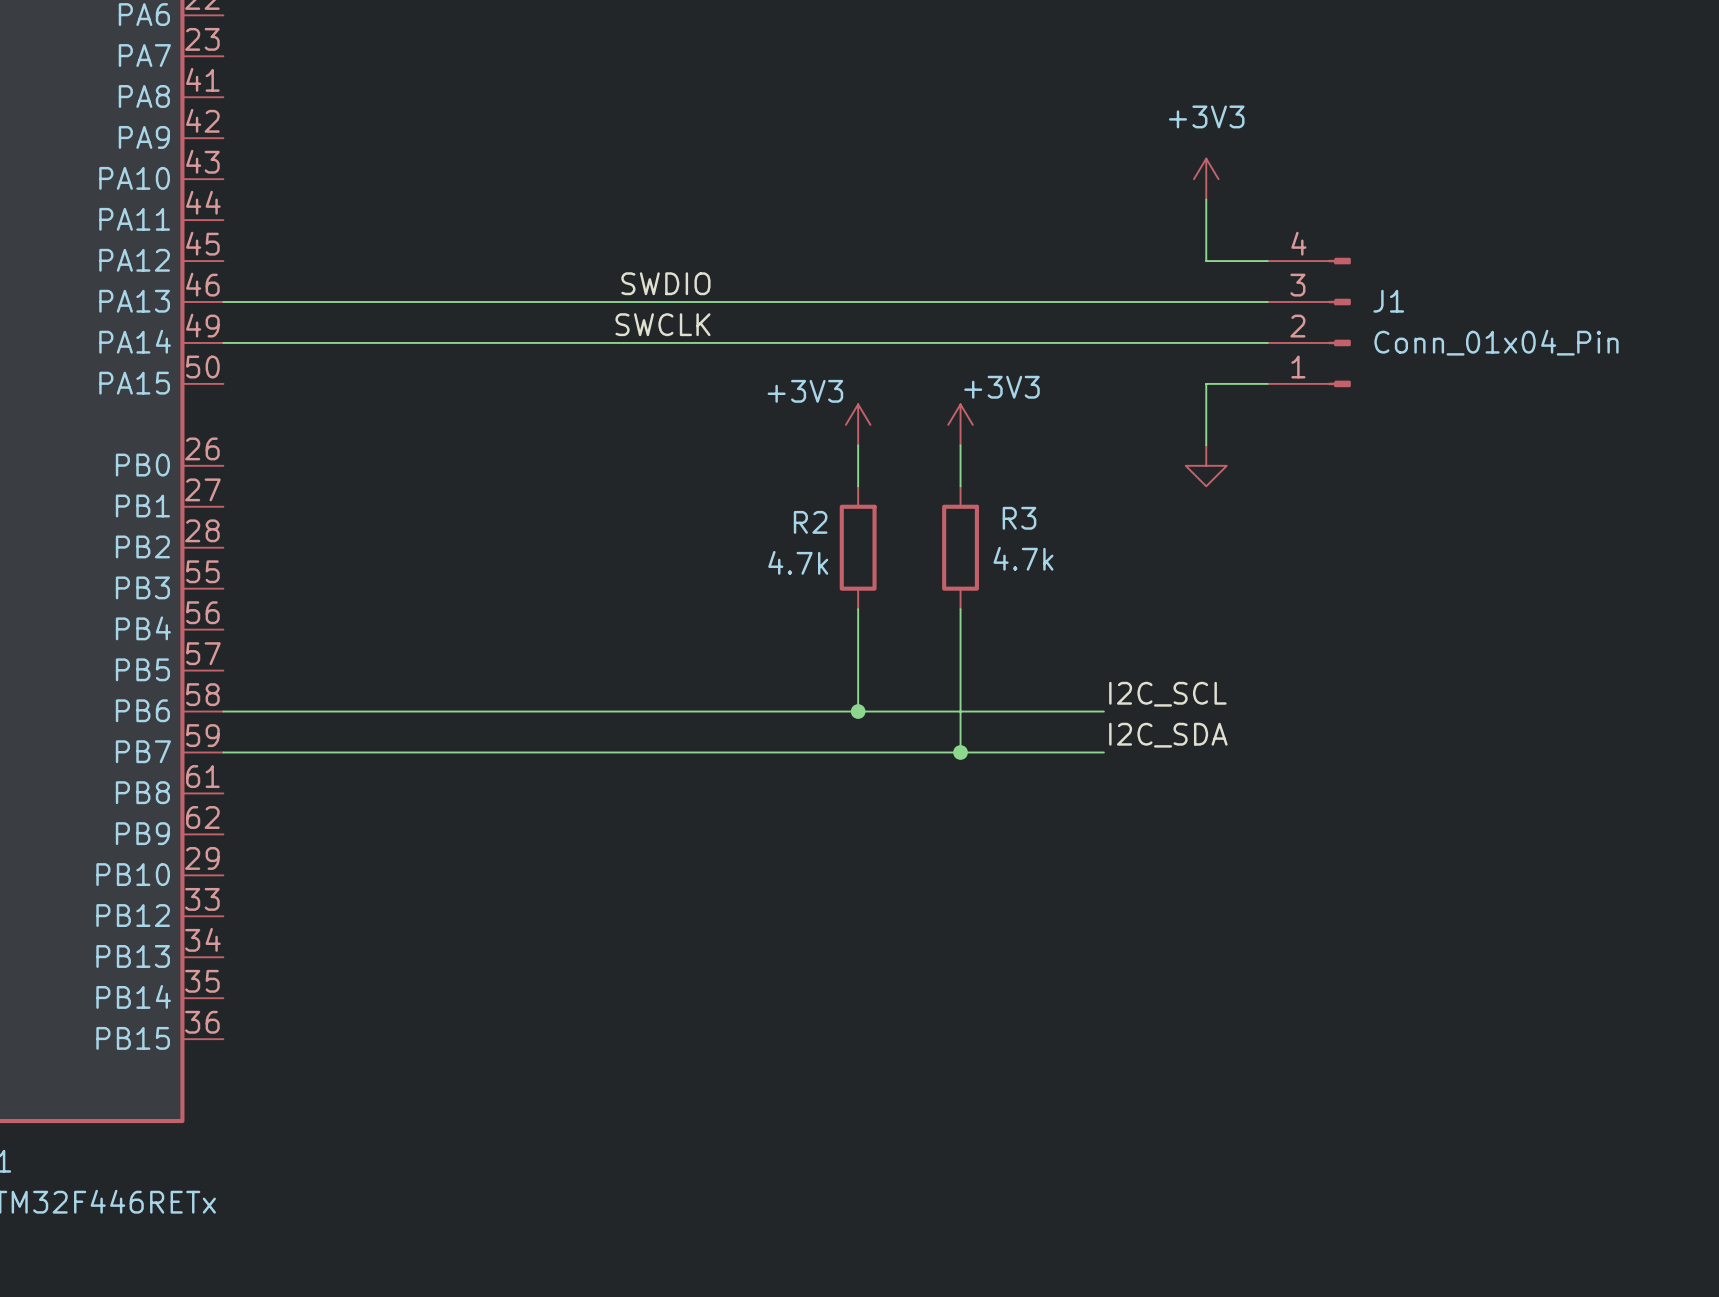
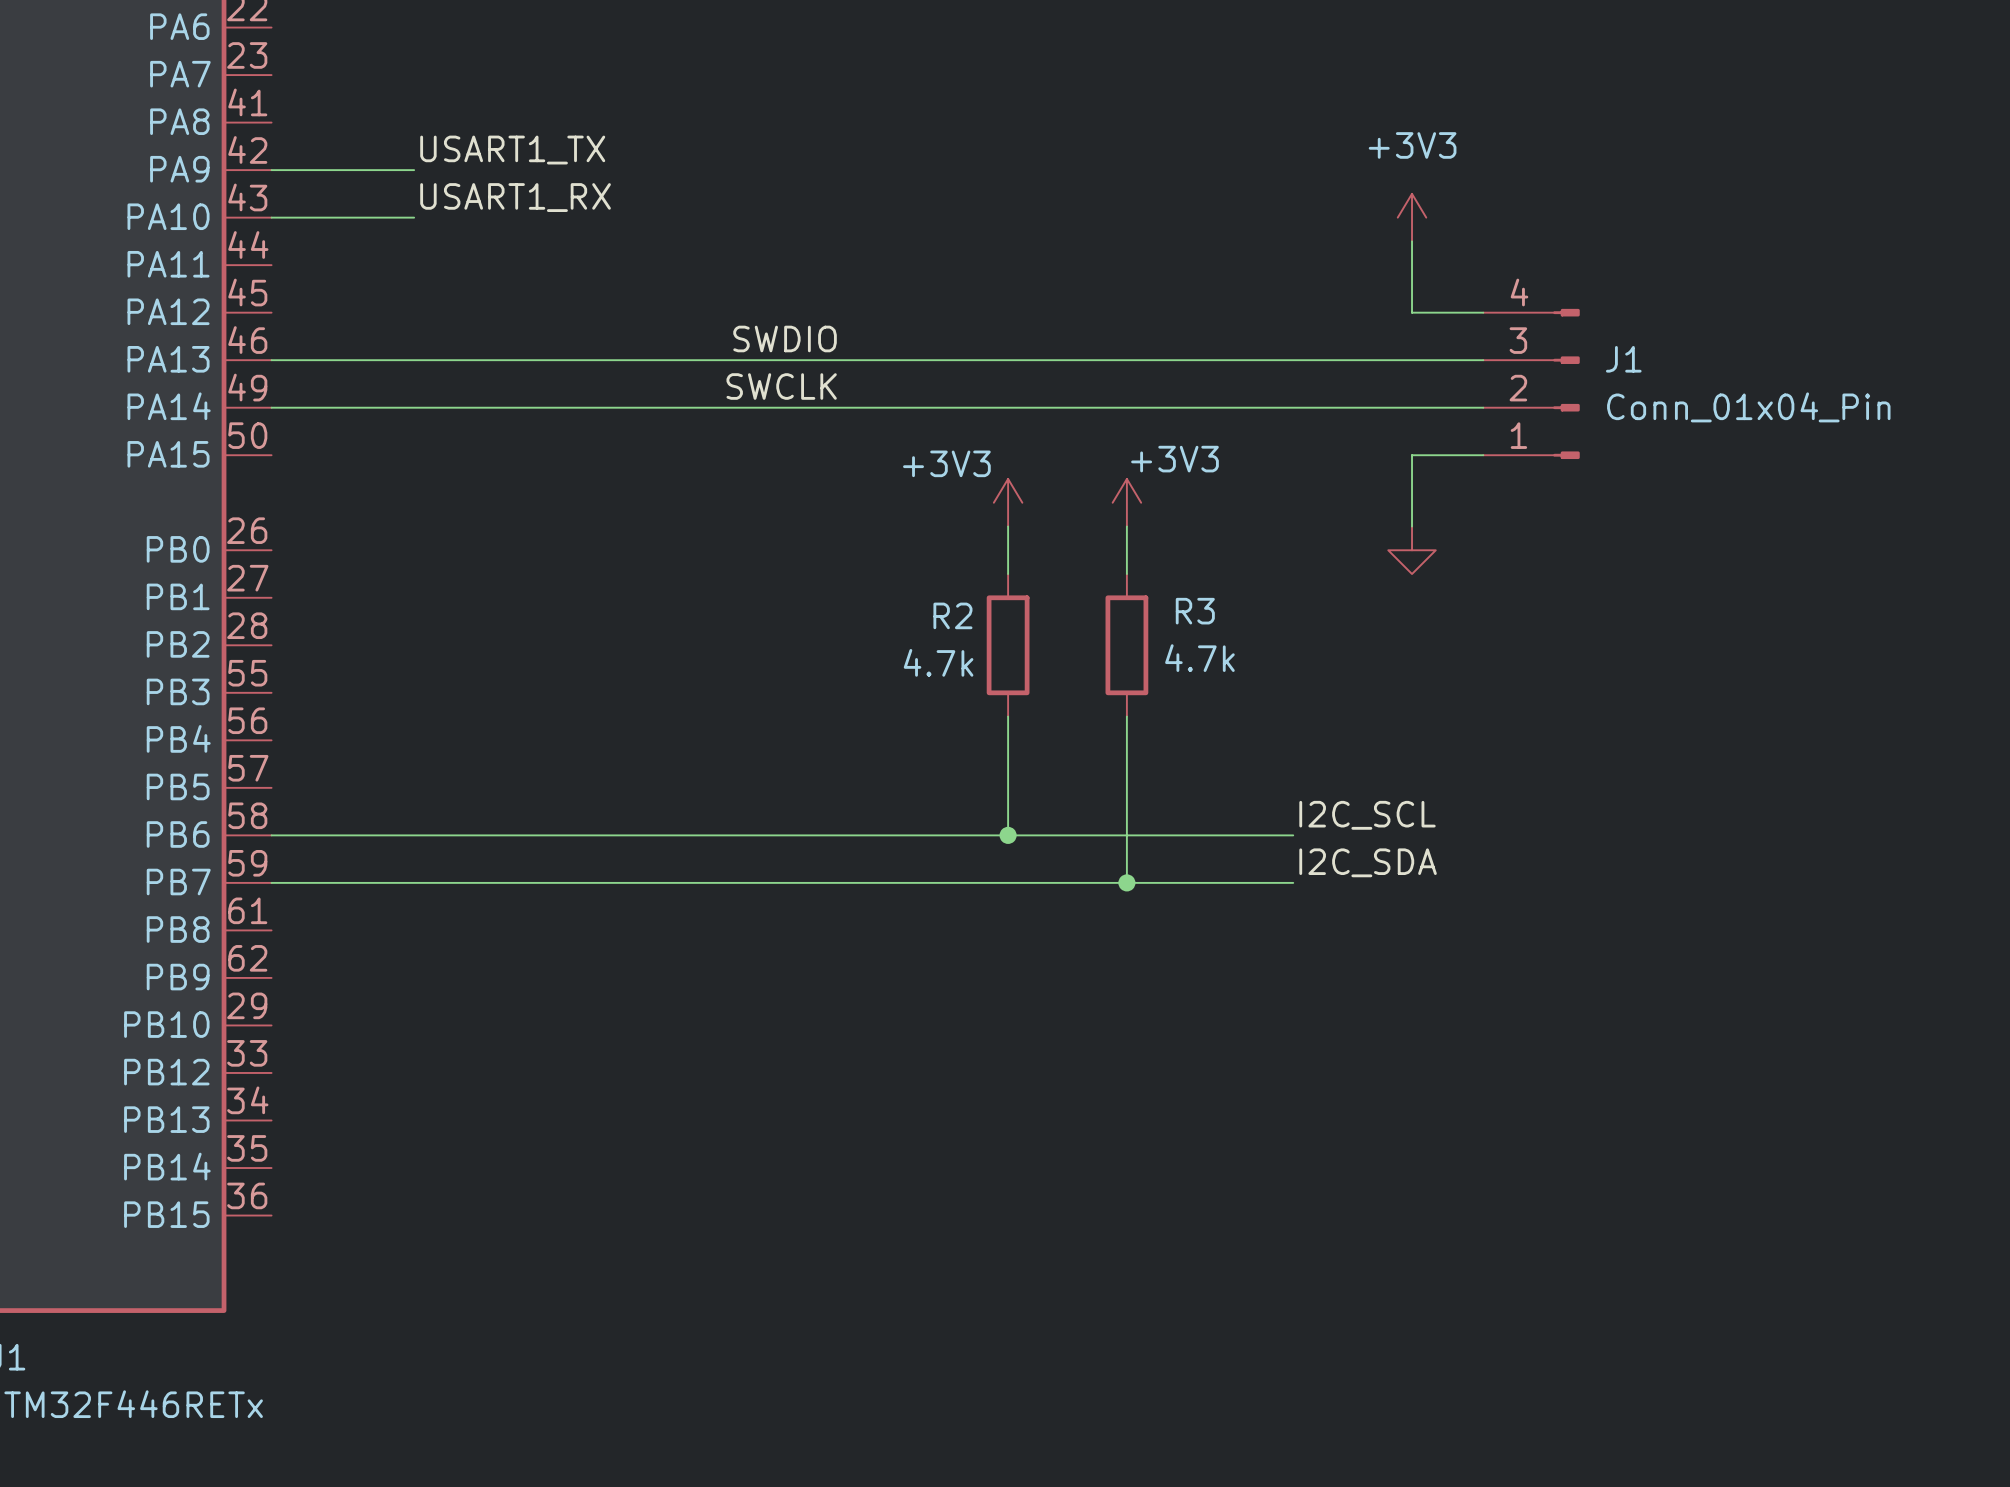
label: none -> USART1_TX (512, 150)
wire: none -> (271, 170) (414, 170)
label: none -> USART1_RX (515, 197)
wire: none -> (271, 217) (414, 217)

